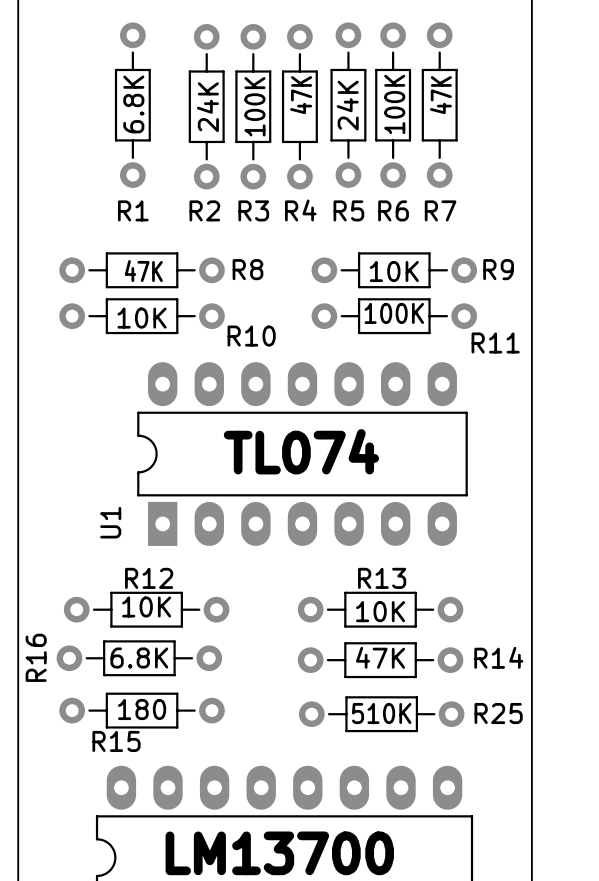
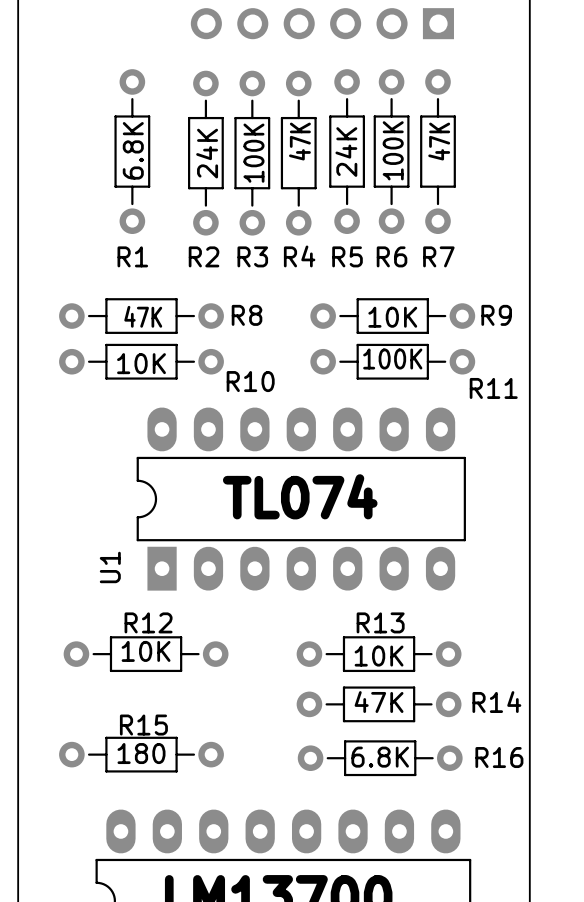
R16: 6.8K (139, 658) -> none
R25 value: 510K (381, 713) -> 6.8K (380, 757)
R25 name: R25 (498, 713) -> R16 (499, 757)
R15 name position: R15 (116, 741) -> R15 (143, 725)

